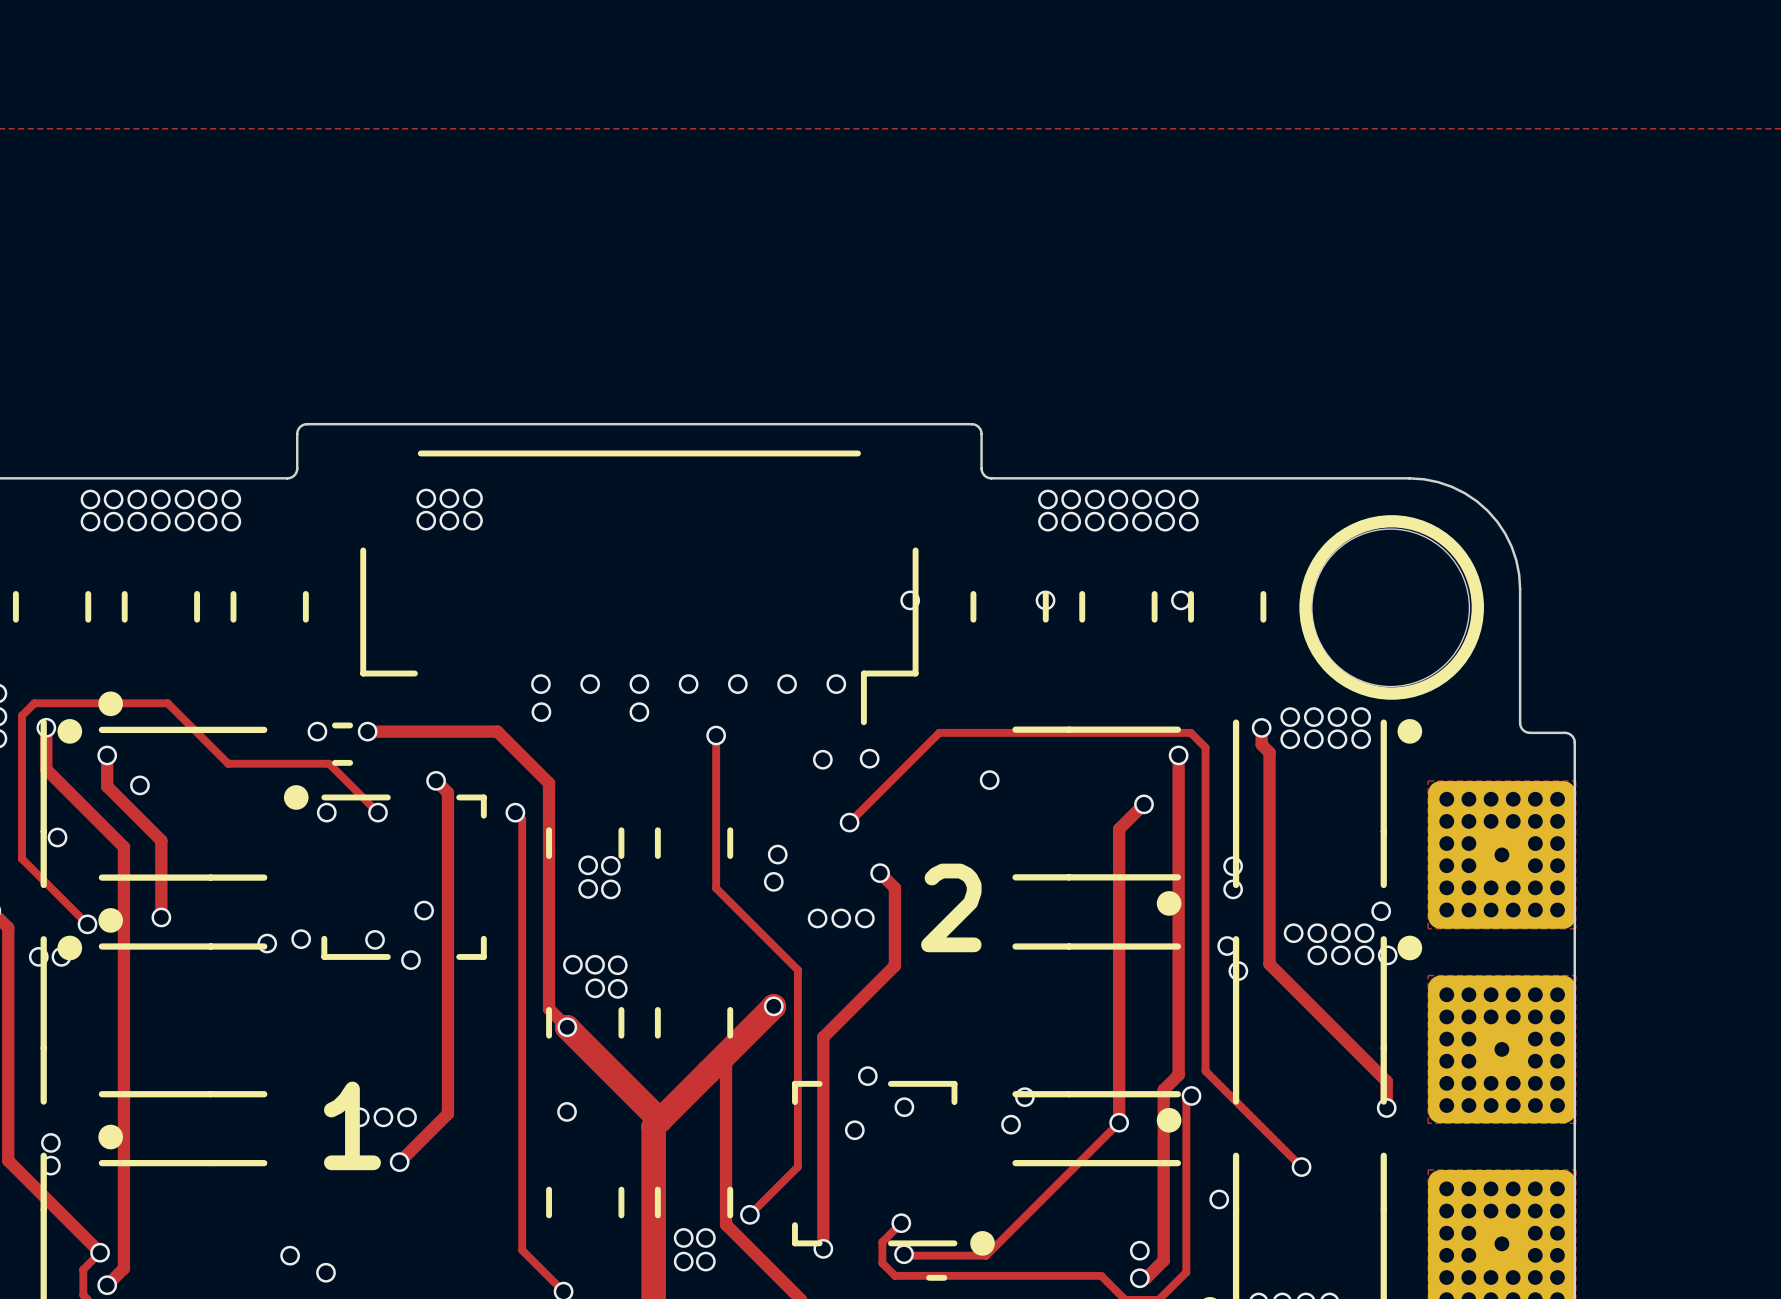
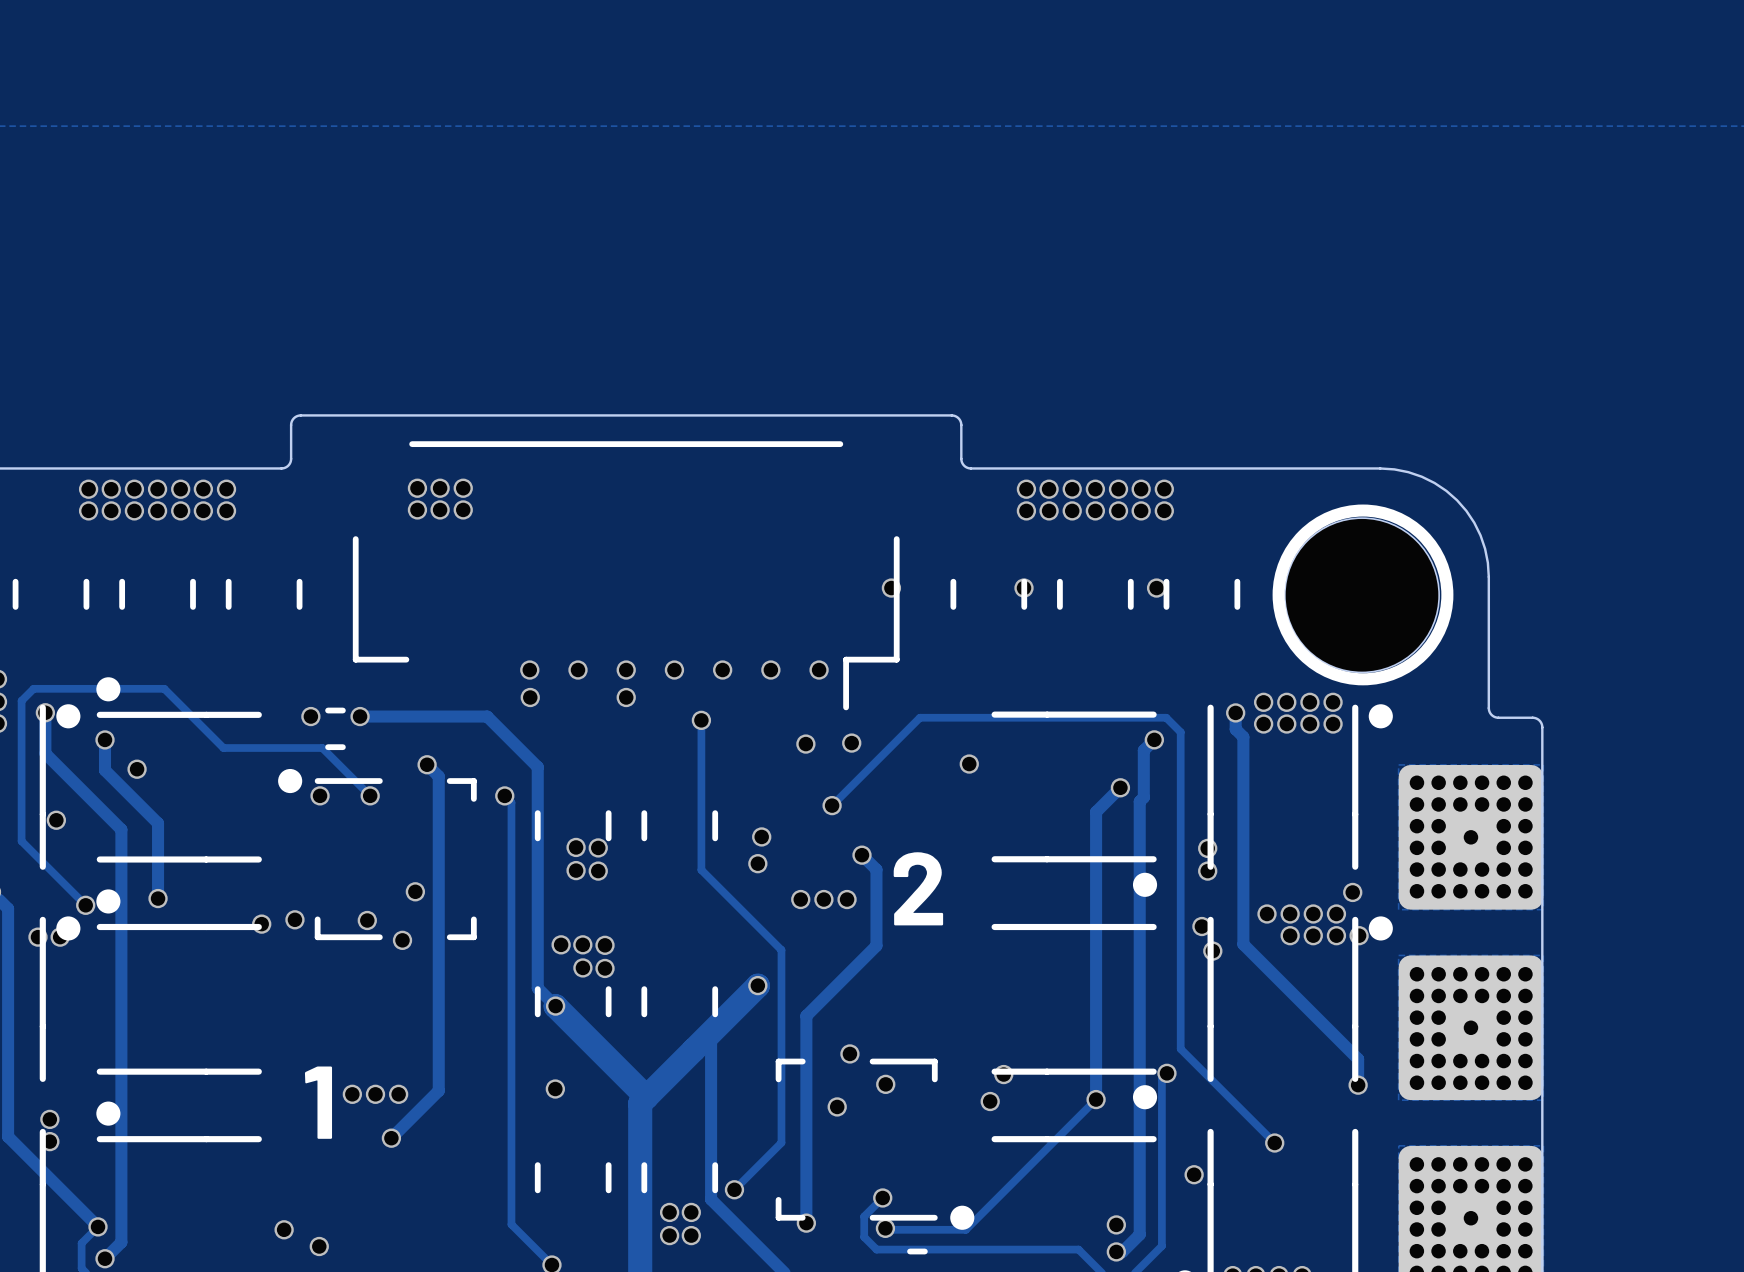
track: (1178, 755) (1178, 1075) (1163, 1089) -> (1154, 739) (1143, 750) (1143, 797) (1139, 801) (1139, 1067)

